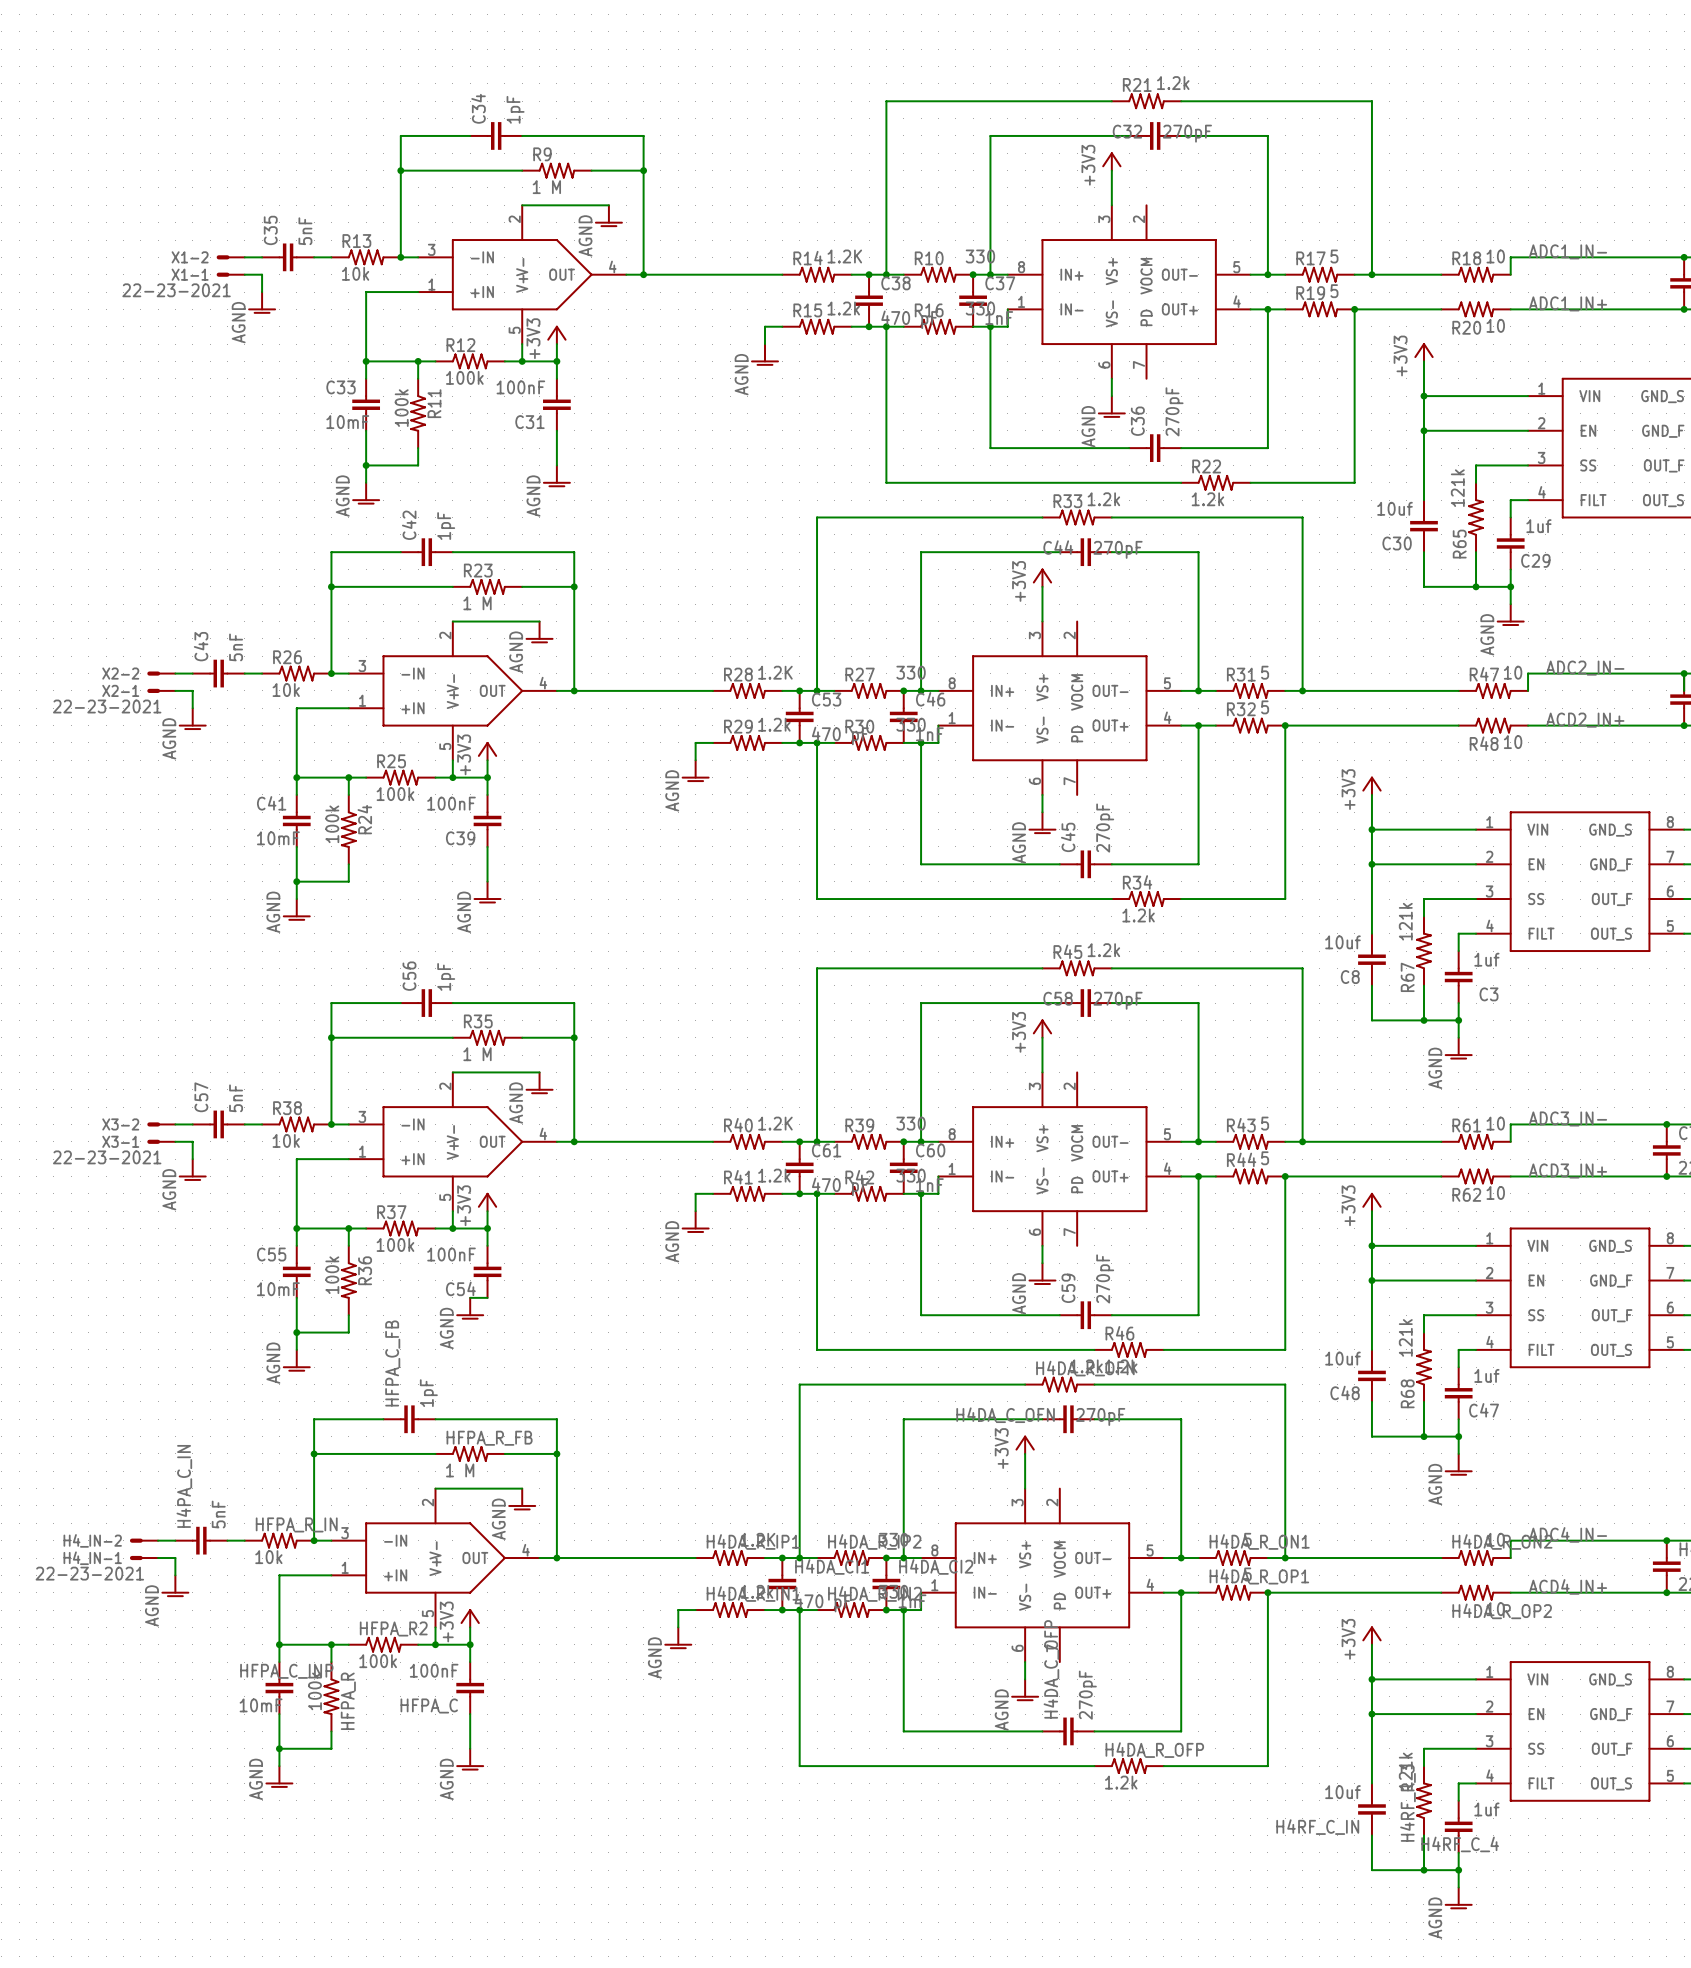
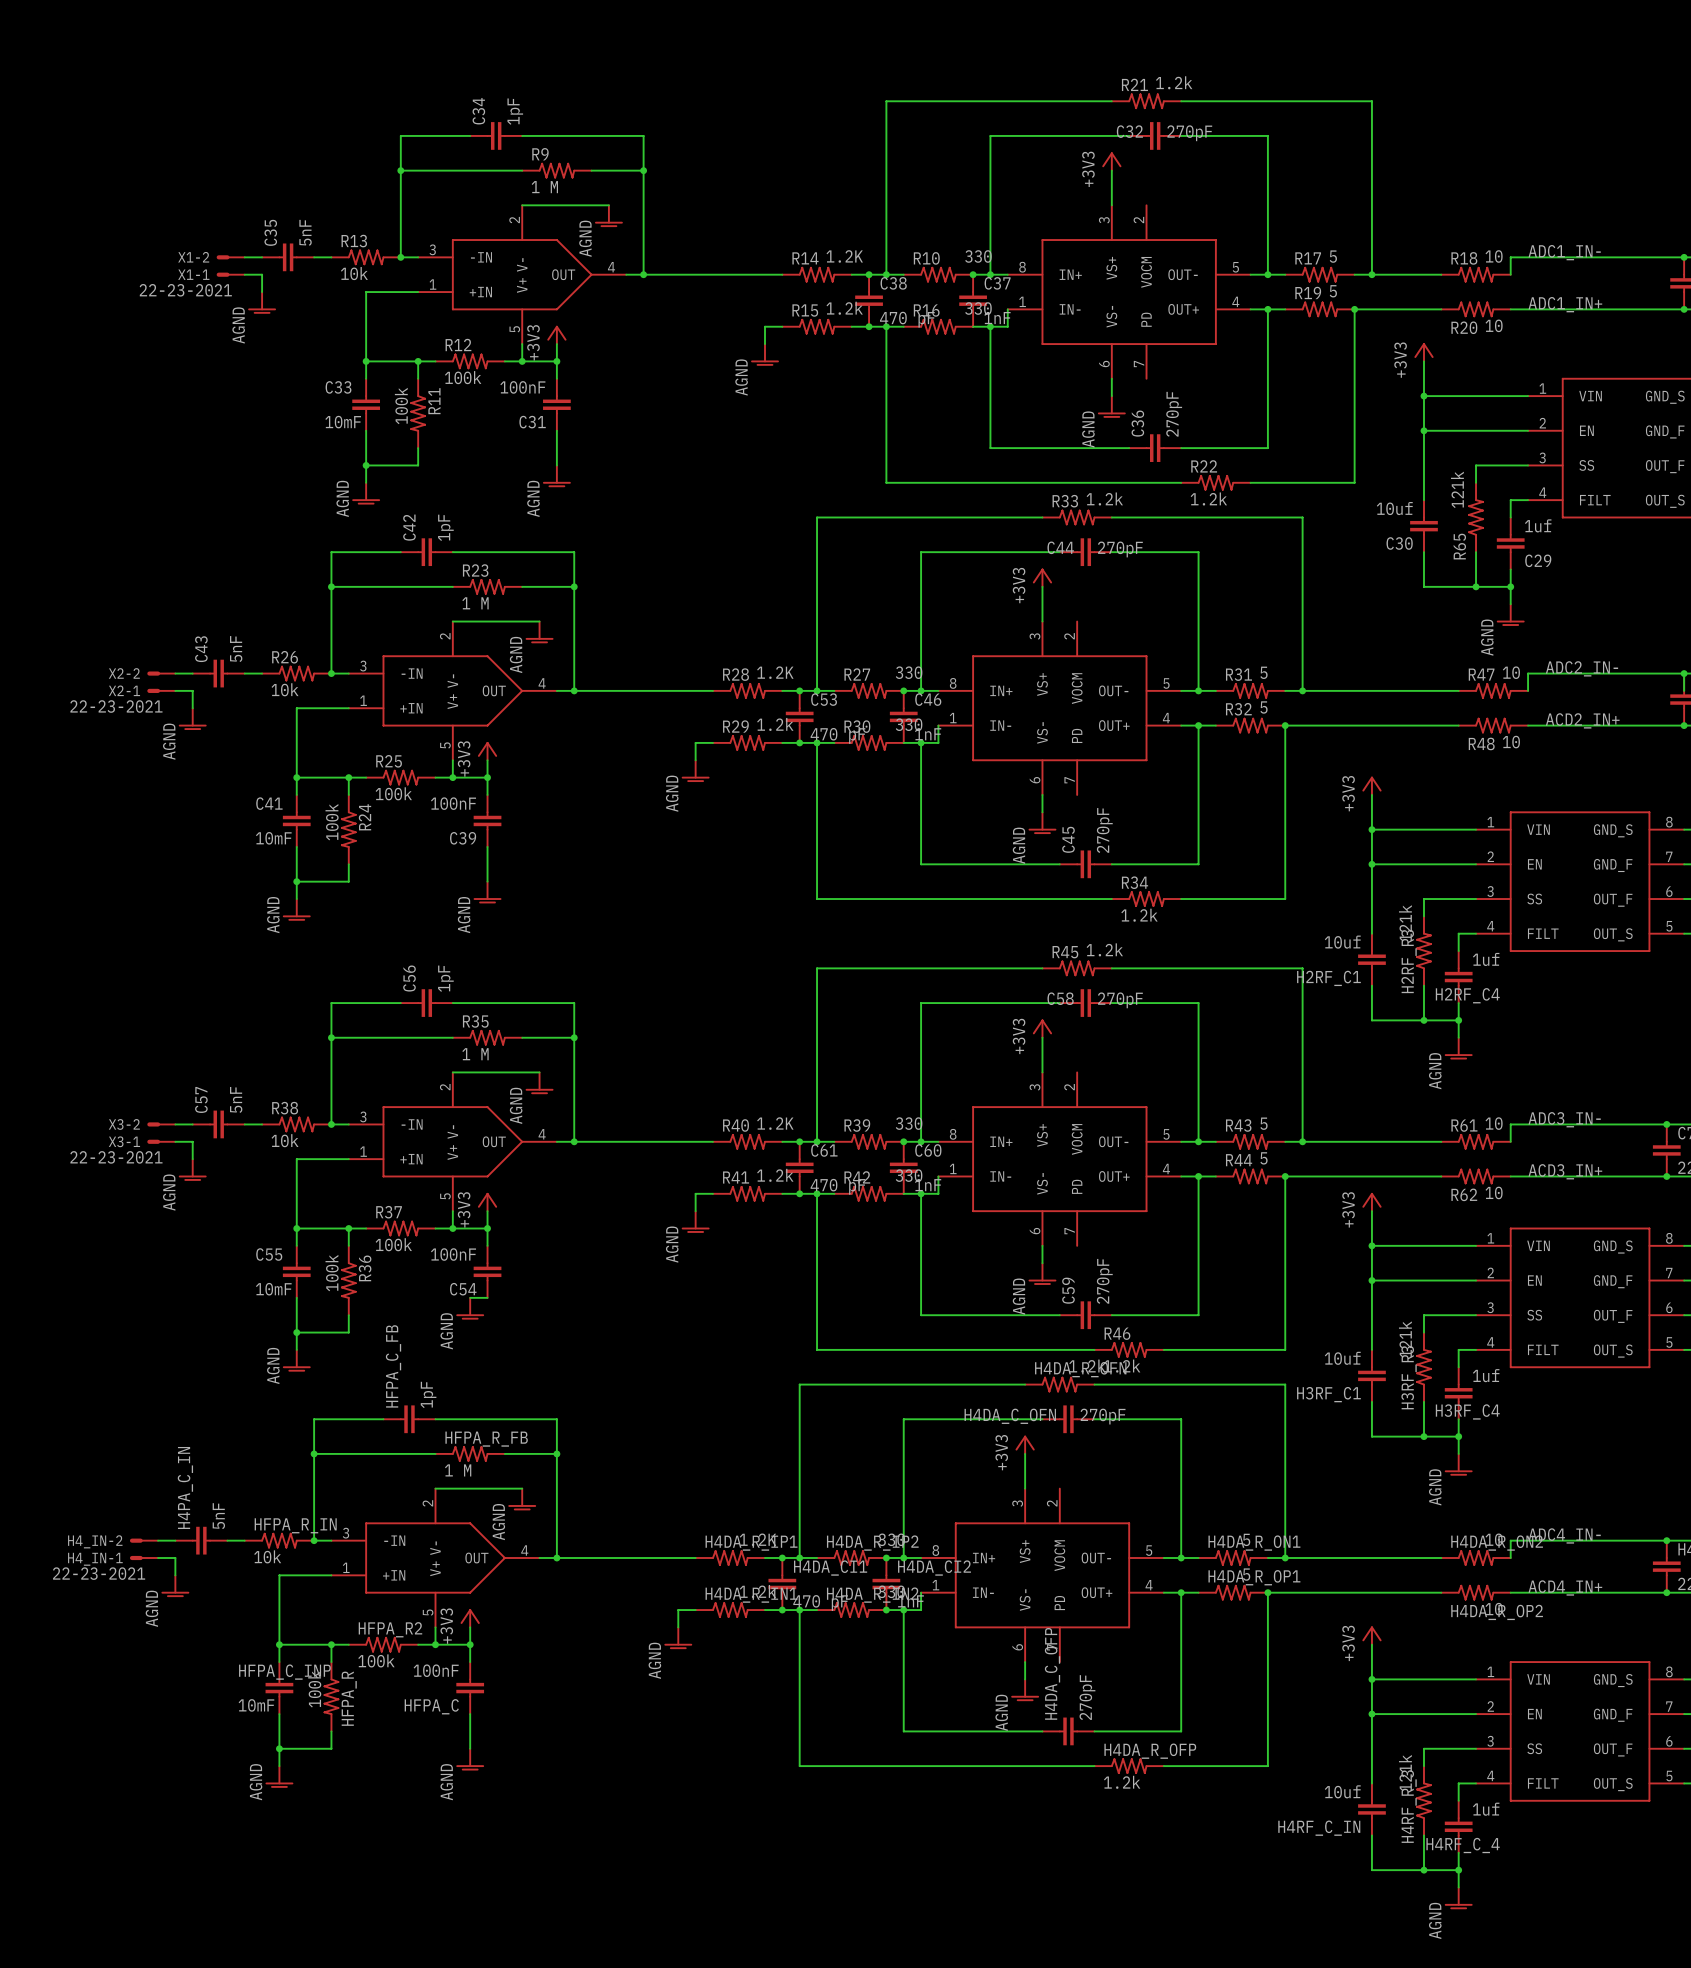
C8 name: C8 (1350, 977) -> H2RF_C1 (1328, 978)
R67 name: R67 (1407, 977) -> H2RF_R3 (1409, 961)
C3 name: C3 (1488, 994) -> H2RF_C4 (1467, 995)
C48 name: C48 (1345, 1392) -> H3RF_C1 (1328, 1394)
R68 name: R68 (1407, 1393) -> H3RF_R3 (1409, 1377)
C47 name: C47 (1484, 1410) -> H3RF_C4 (1467, 1411)

